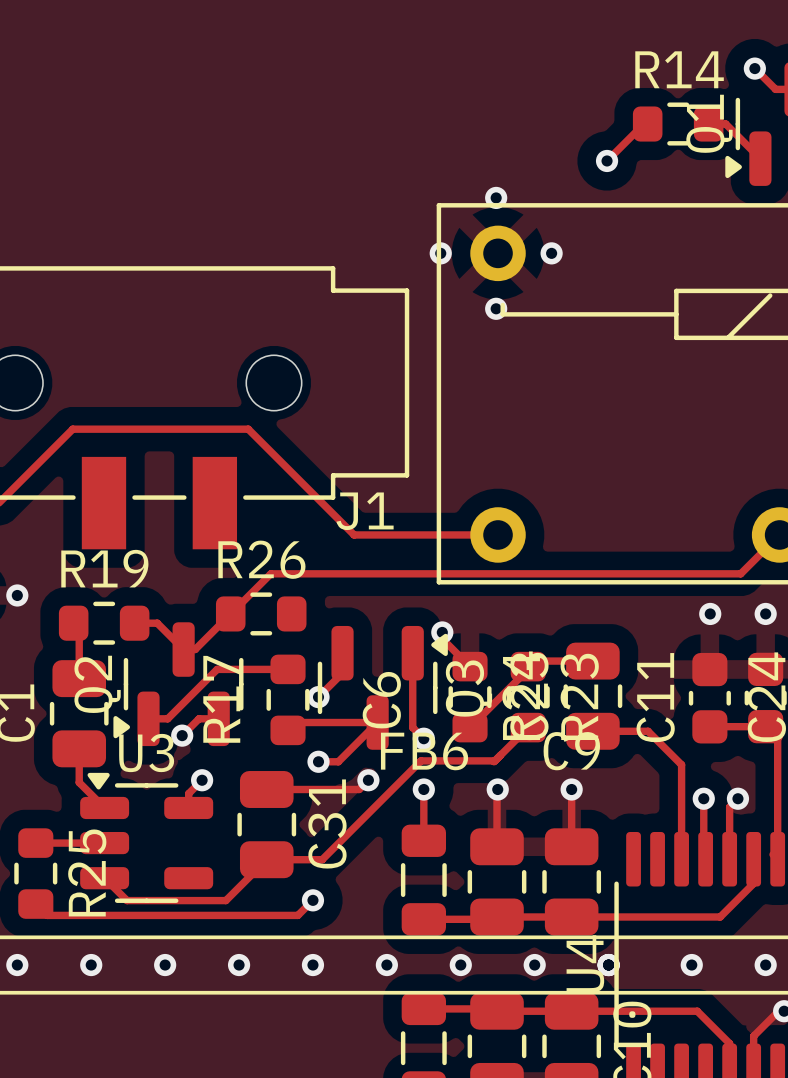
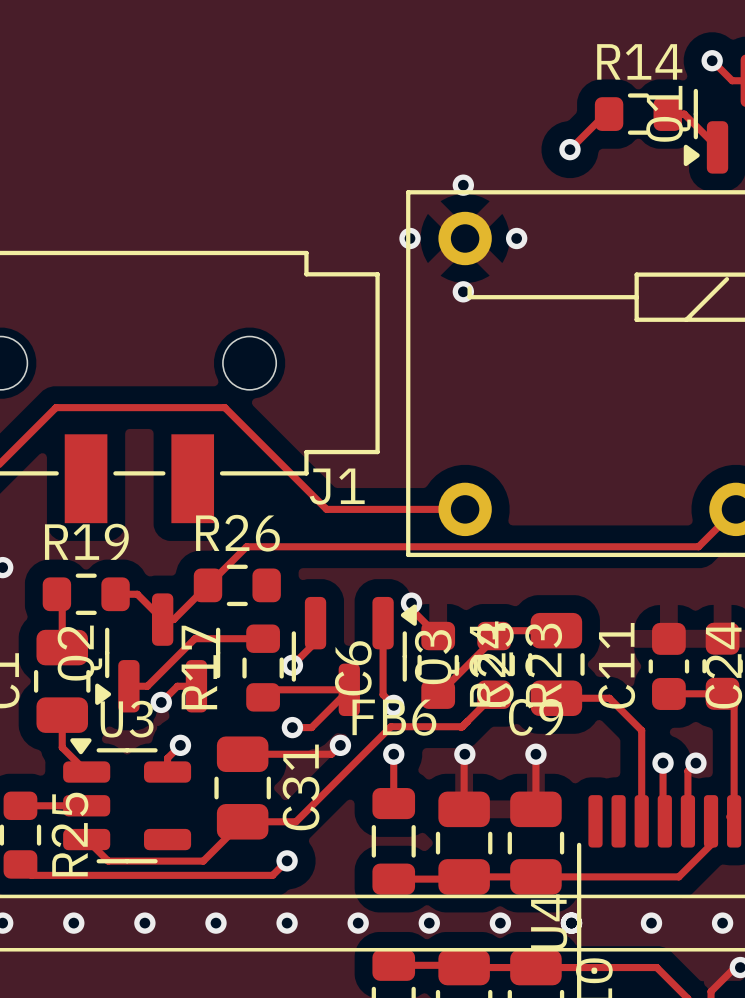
via: (710, 613) -> none
via: (765, 613) -> none

